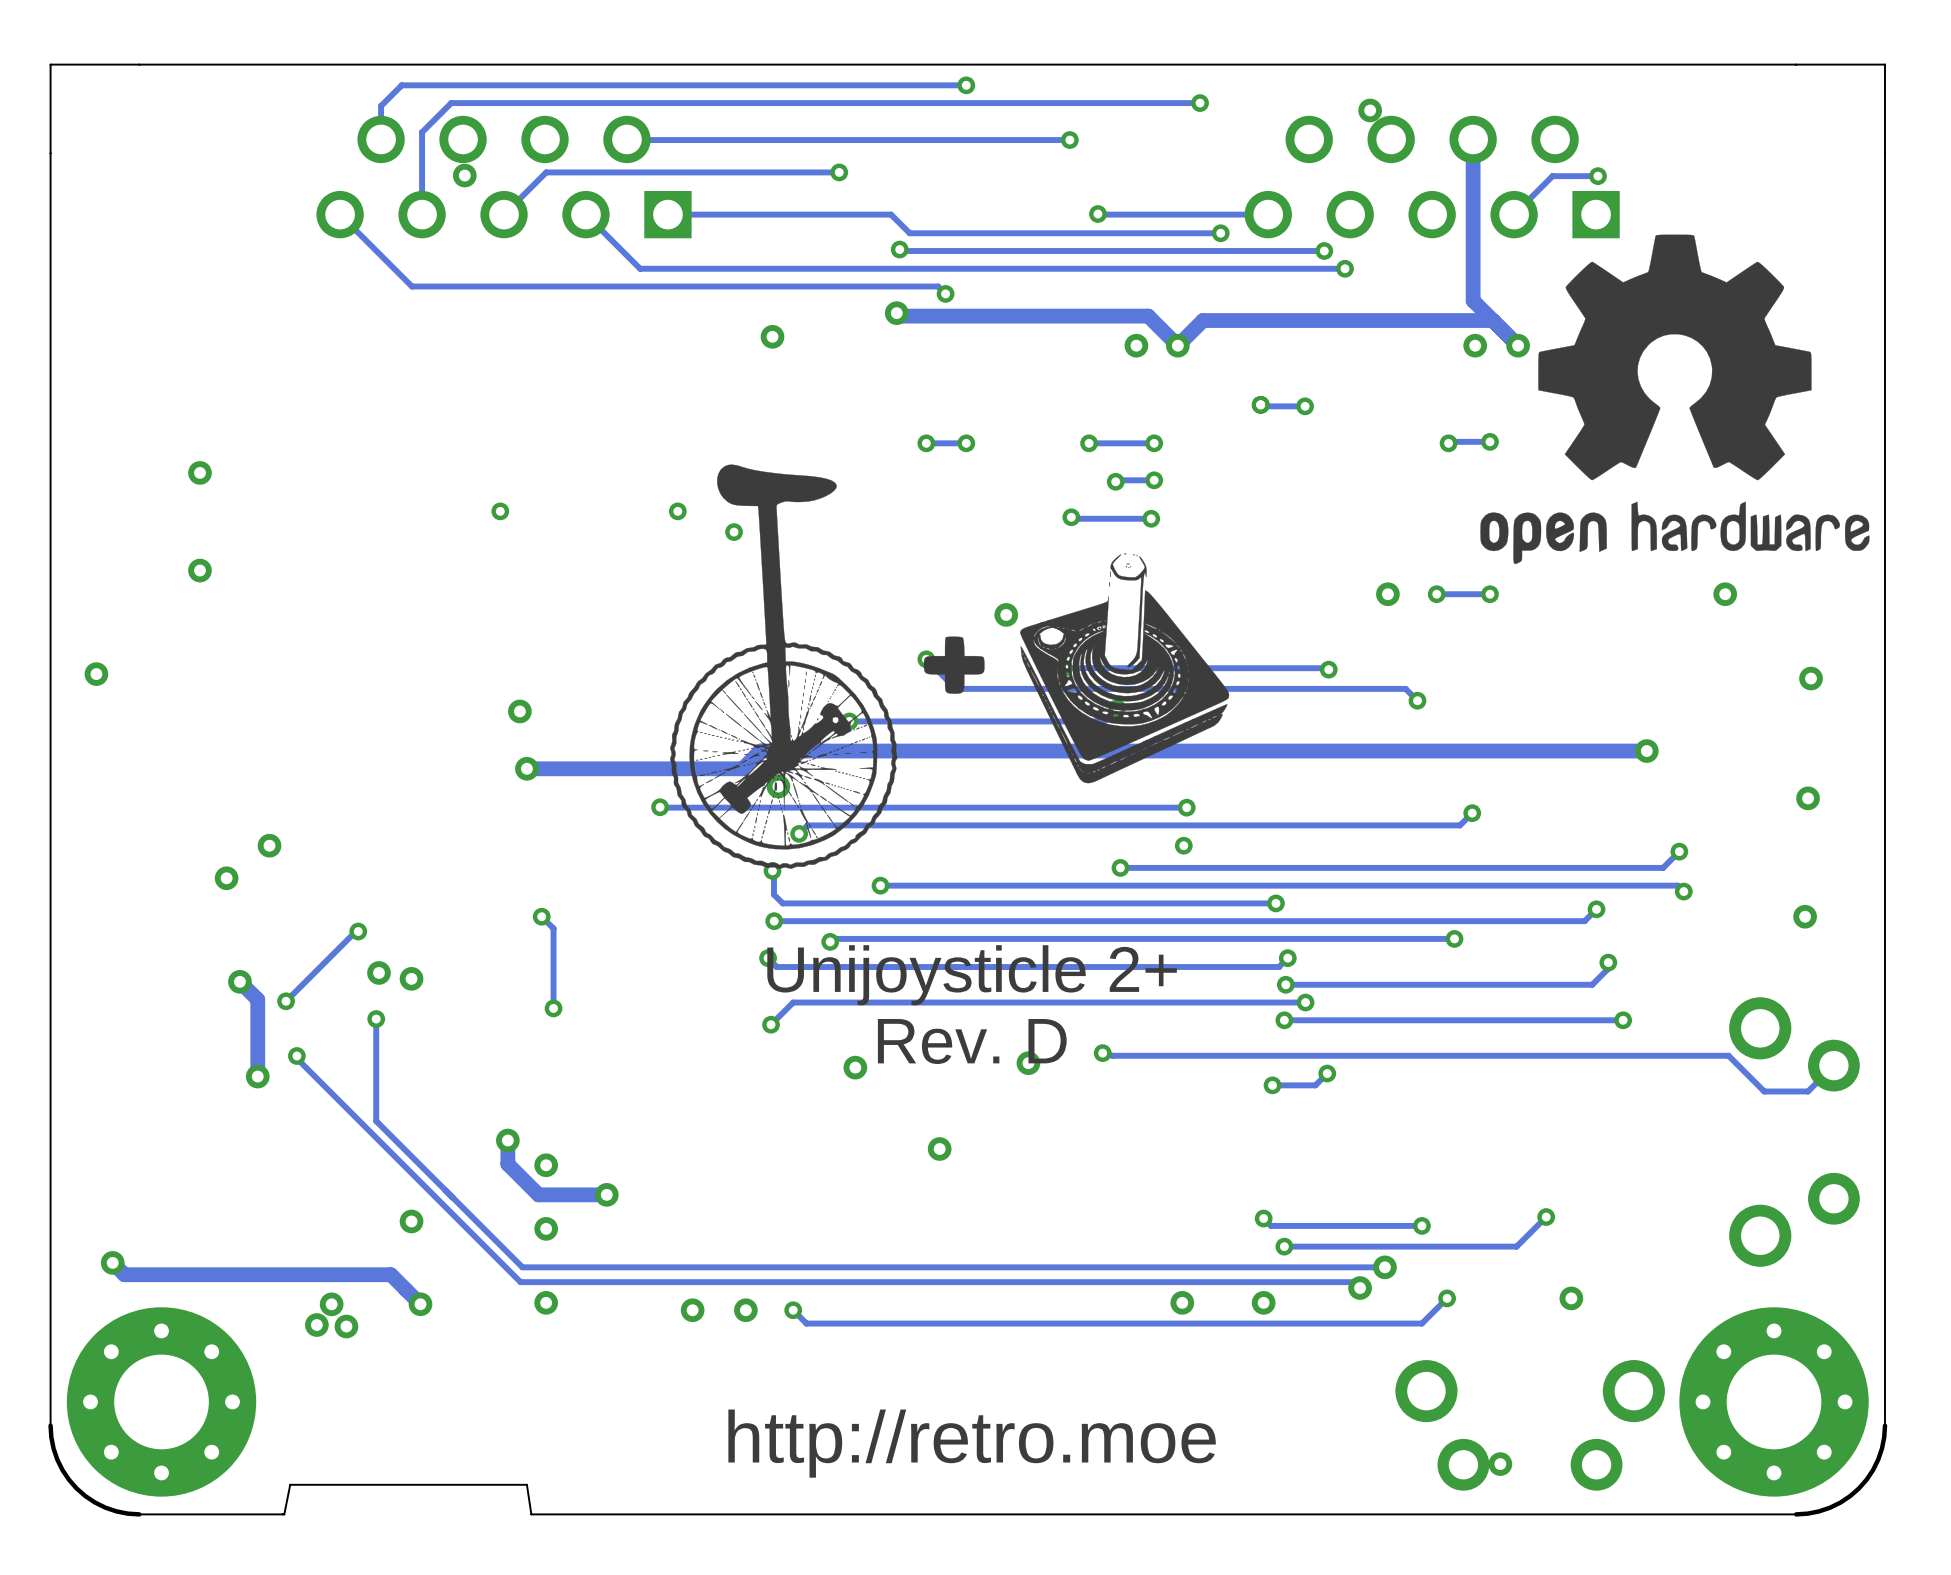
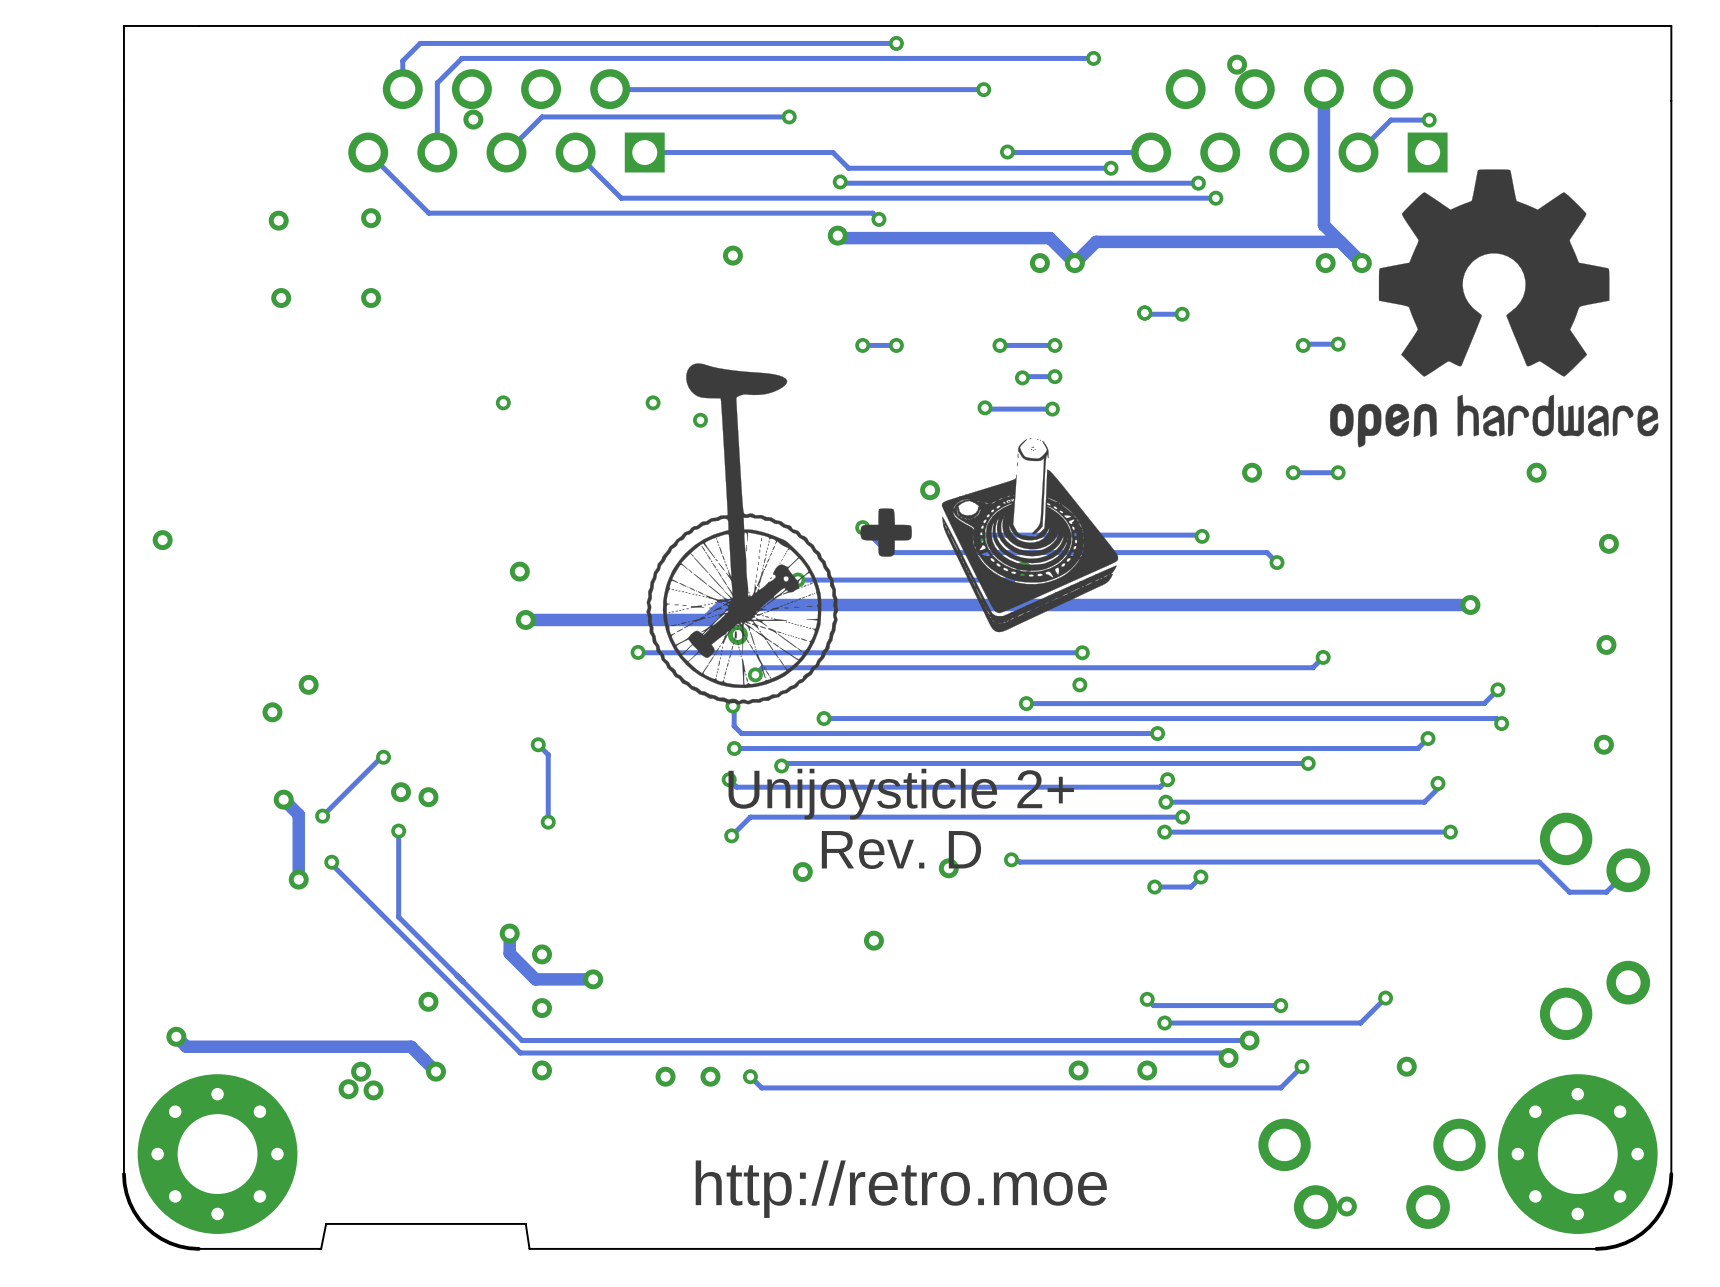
via: none -> (371, 218)
via: none -> (278, 220)
via: none -> (281, 298)
via: none -> (371, 298)
via: (199, 472) -> none
via: (199, 570) -> none

